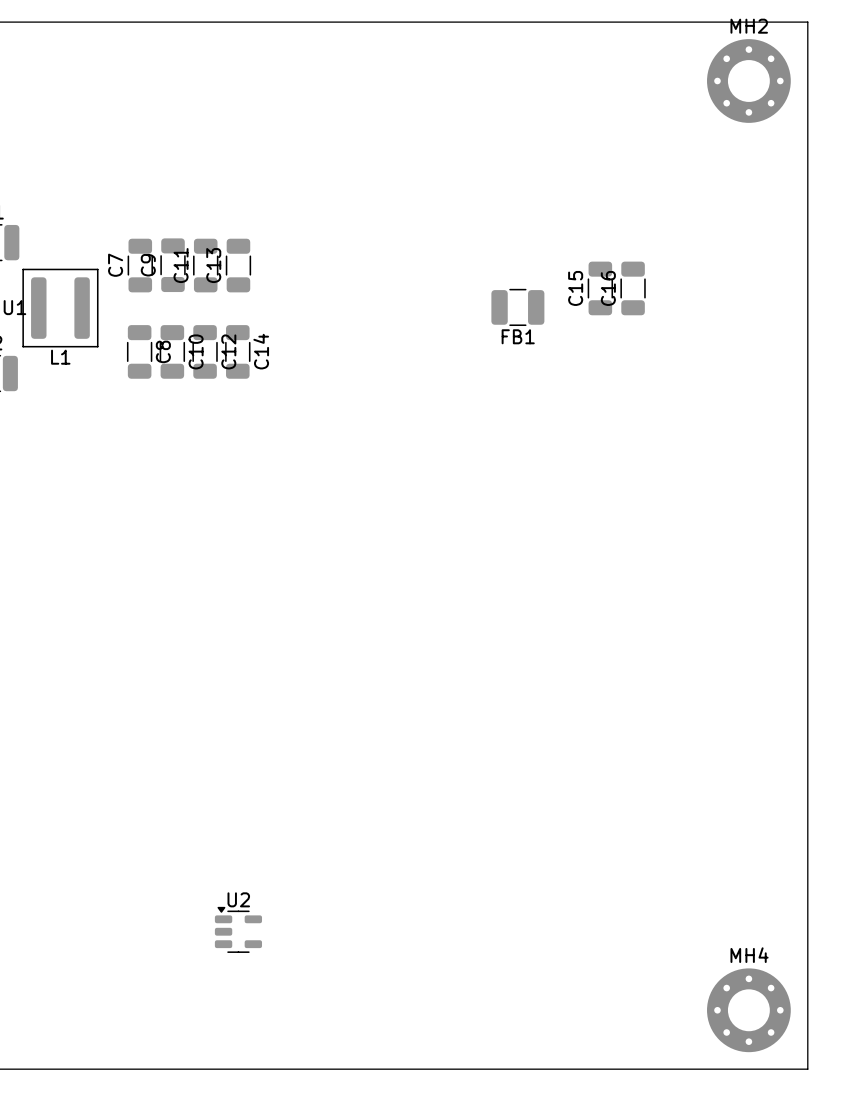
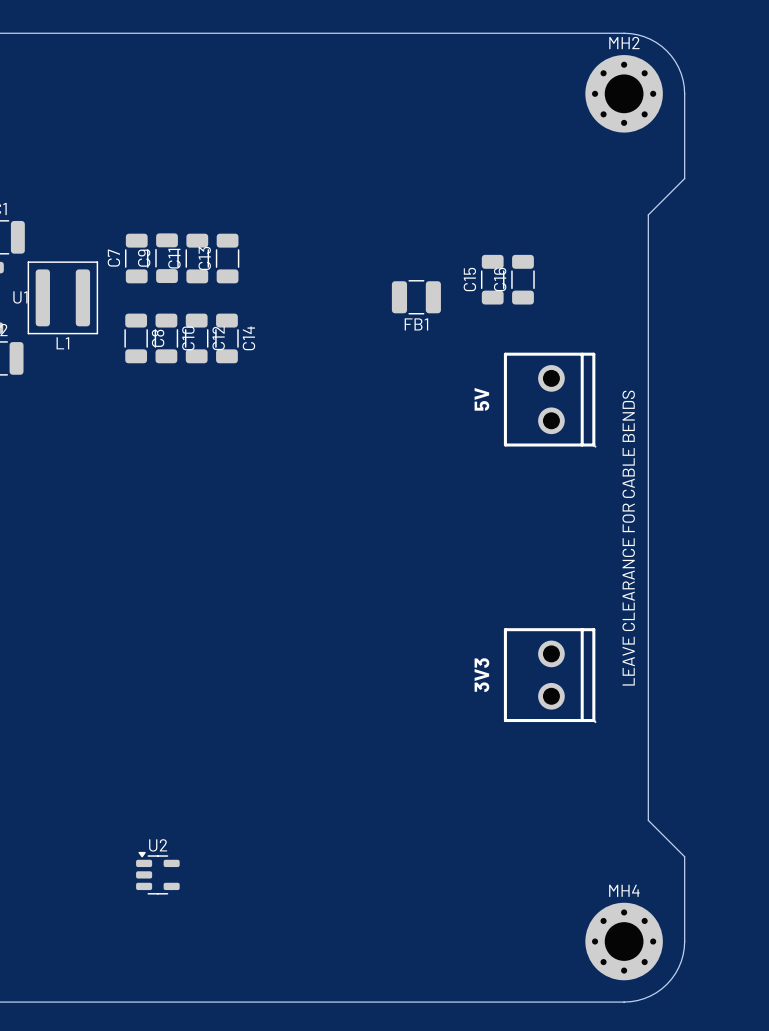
board edge: (667, 22) (807, 22) (807, 1069) (667, 1069) -> (624, 33) (644, 36) (656, 42) (666, 51) (675, 61) (681, 73) (684, 93) (684, 178) (648, 214) (648, 820) (684, 856) (684, 948) (681, 961) (675, 973) (661, 988) (644, 998) (624, 1002)
MH2 position: (748, 80) -> (624, 93)
C15 position: (600, 288) -> (492, 279)
C16 position: (633, 288) -> (522, 279)
FB1 position: (517, 307) -> (416, 297)
text: none -> 5V (481, 399)
part: none -> (550, 399)
text: none -> LEAVE CLEARANCE FOR CABLE BENDS (628, 538)
text: none -> 3V3 (481, 675)
part: none -> (550, 675)
U2 position: (238, 929) -> (157, 873)
MH4 position: (748, 1010) -> (624, 941)

